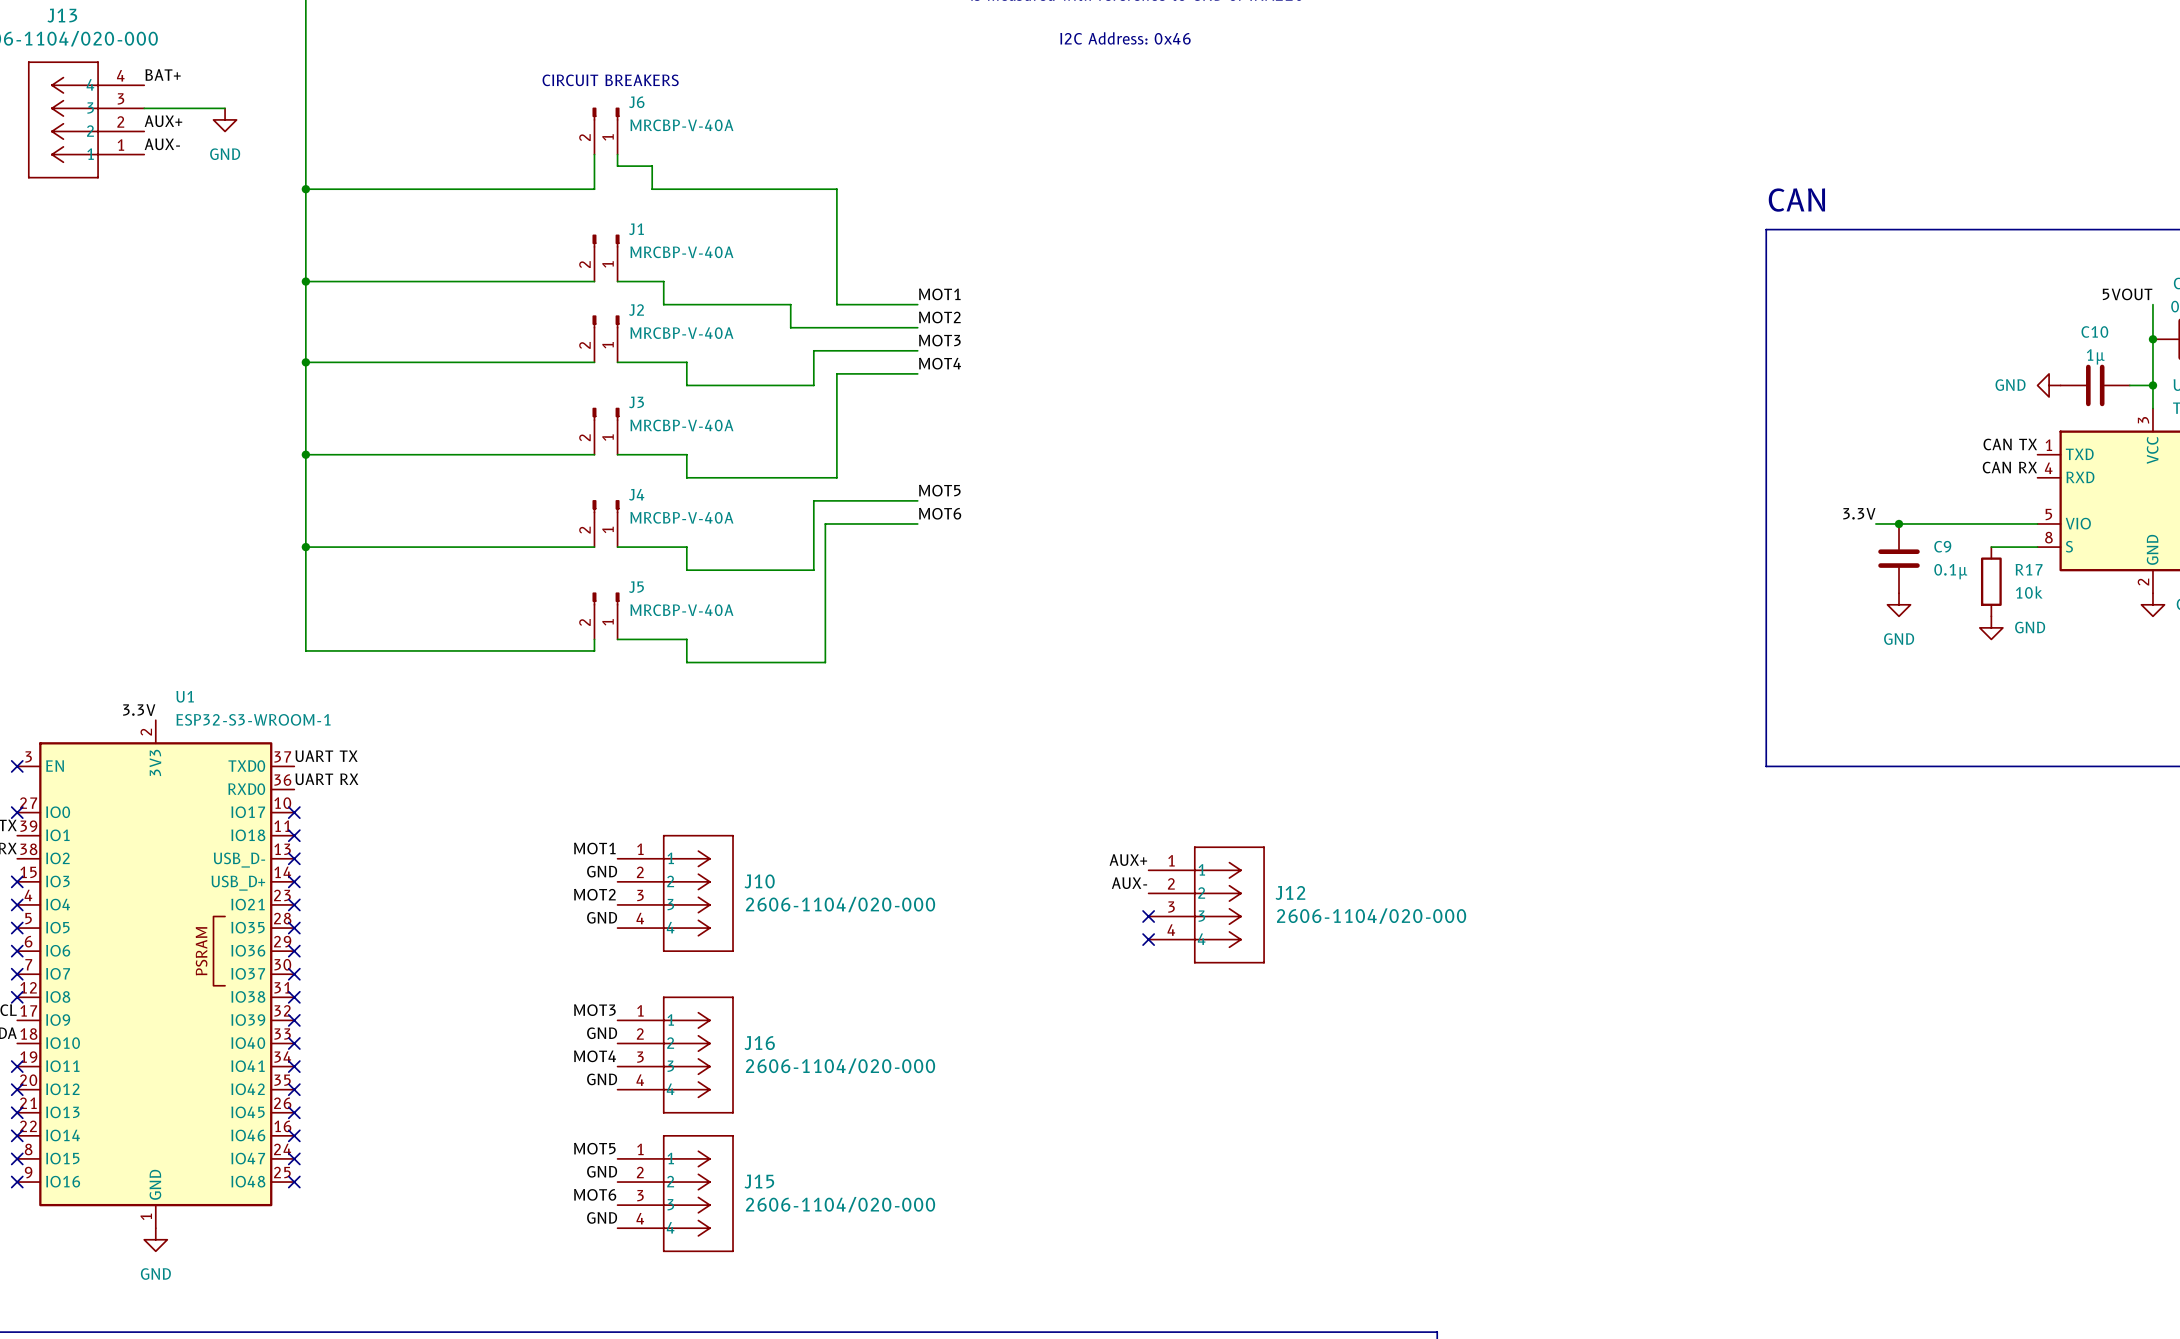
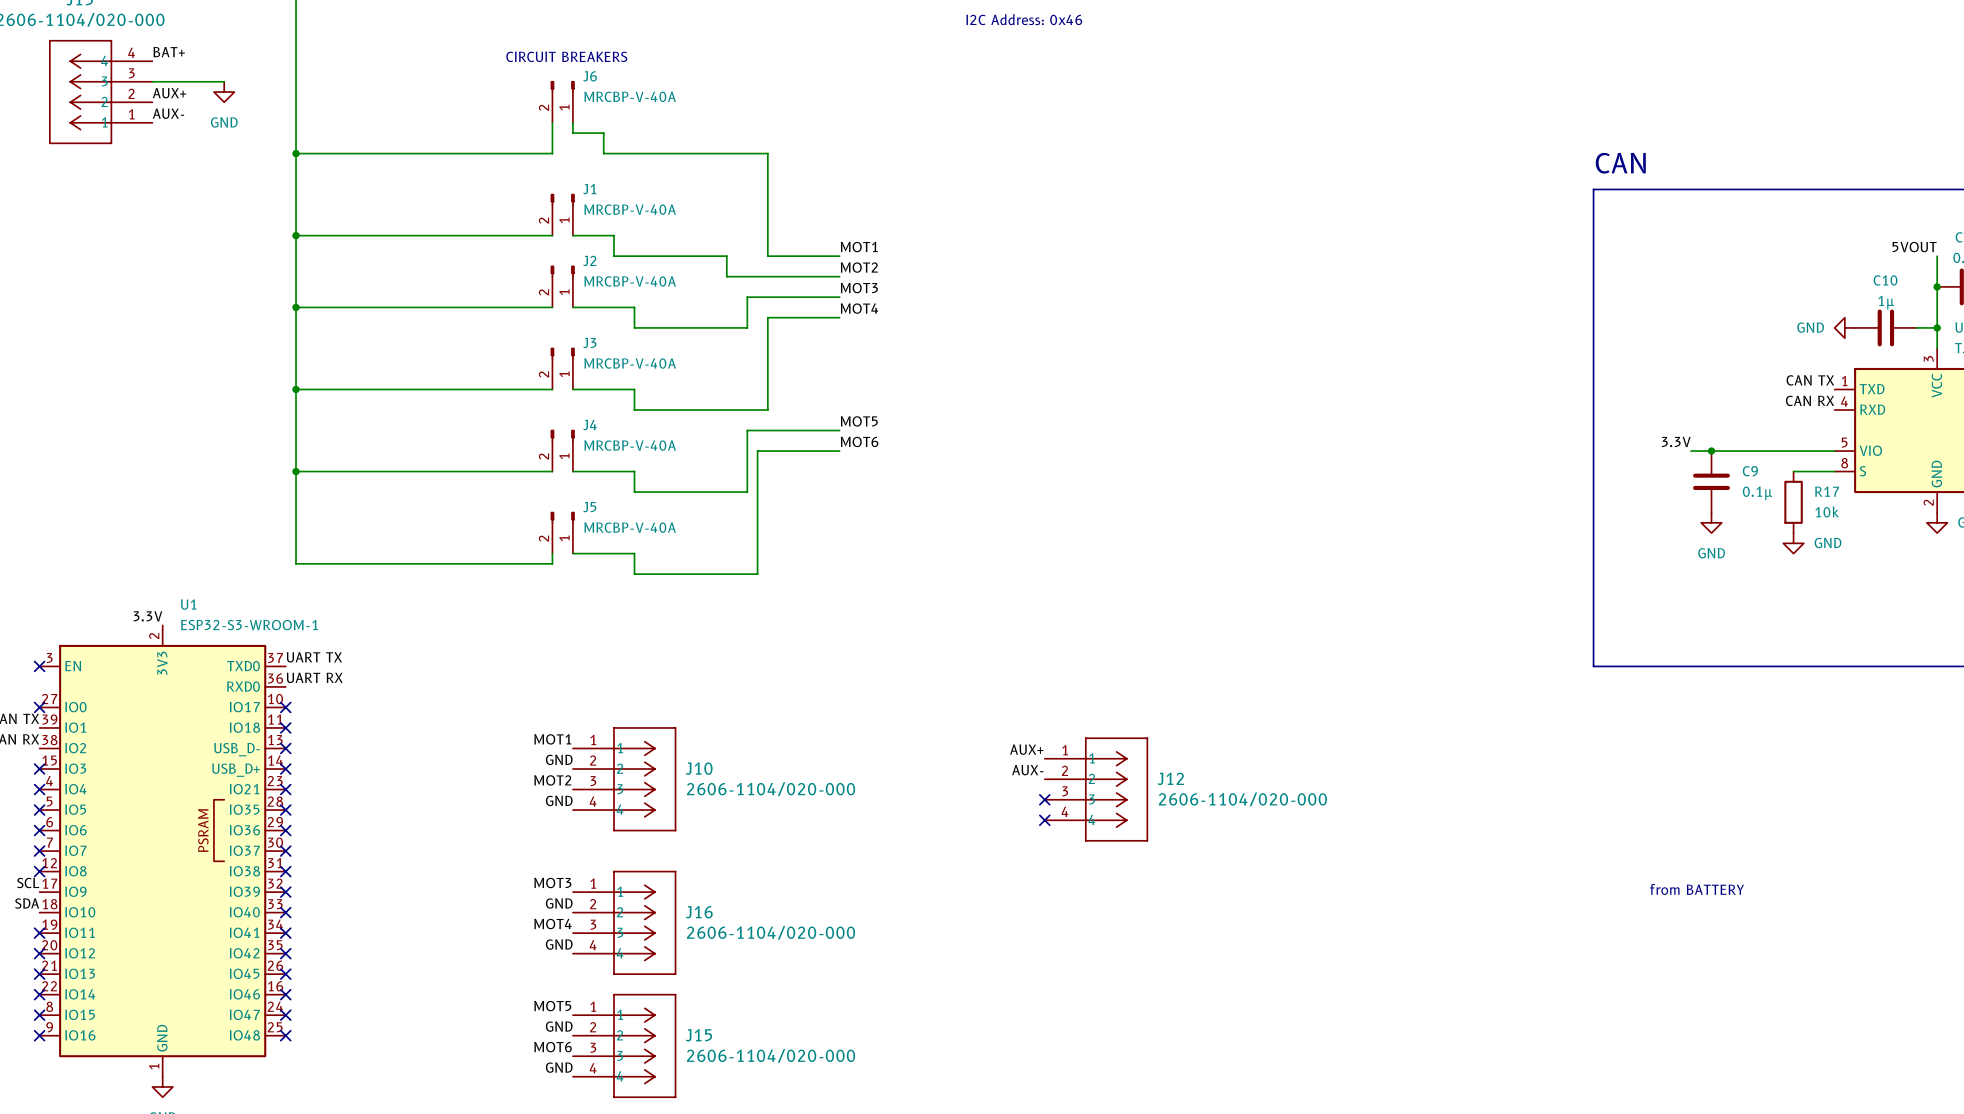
text: none -> from BATTERY (1697, 889)

